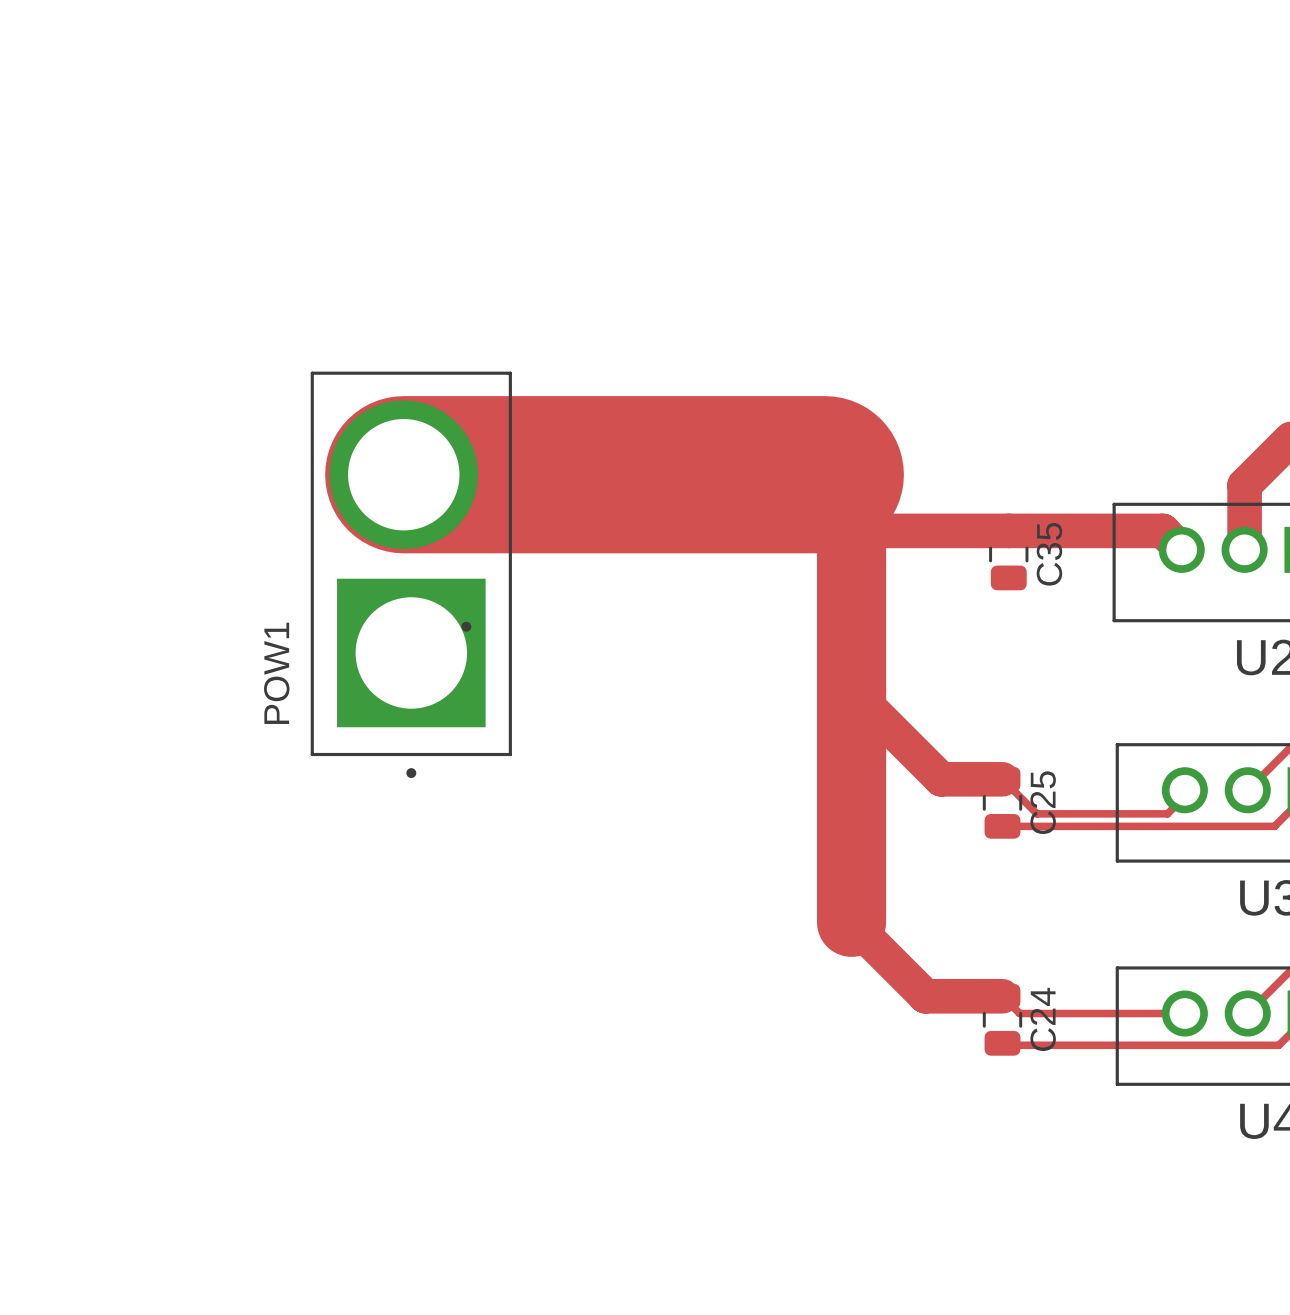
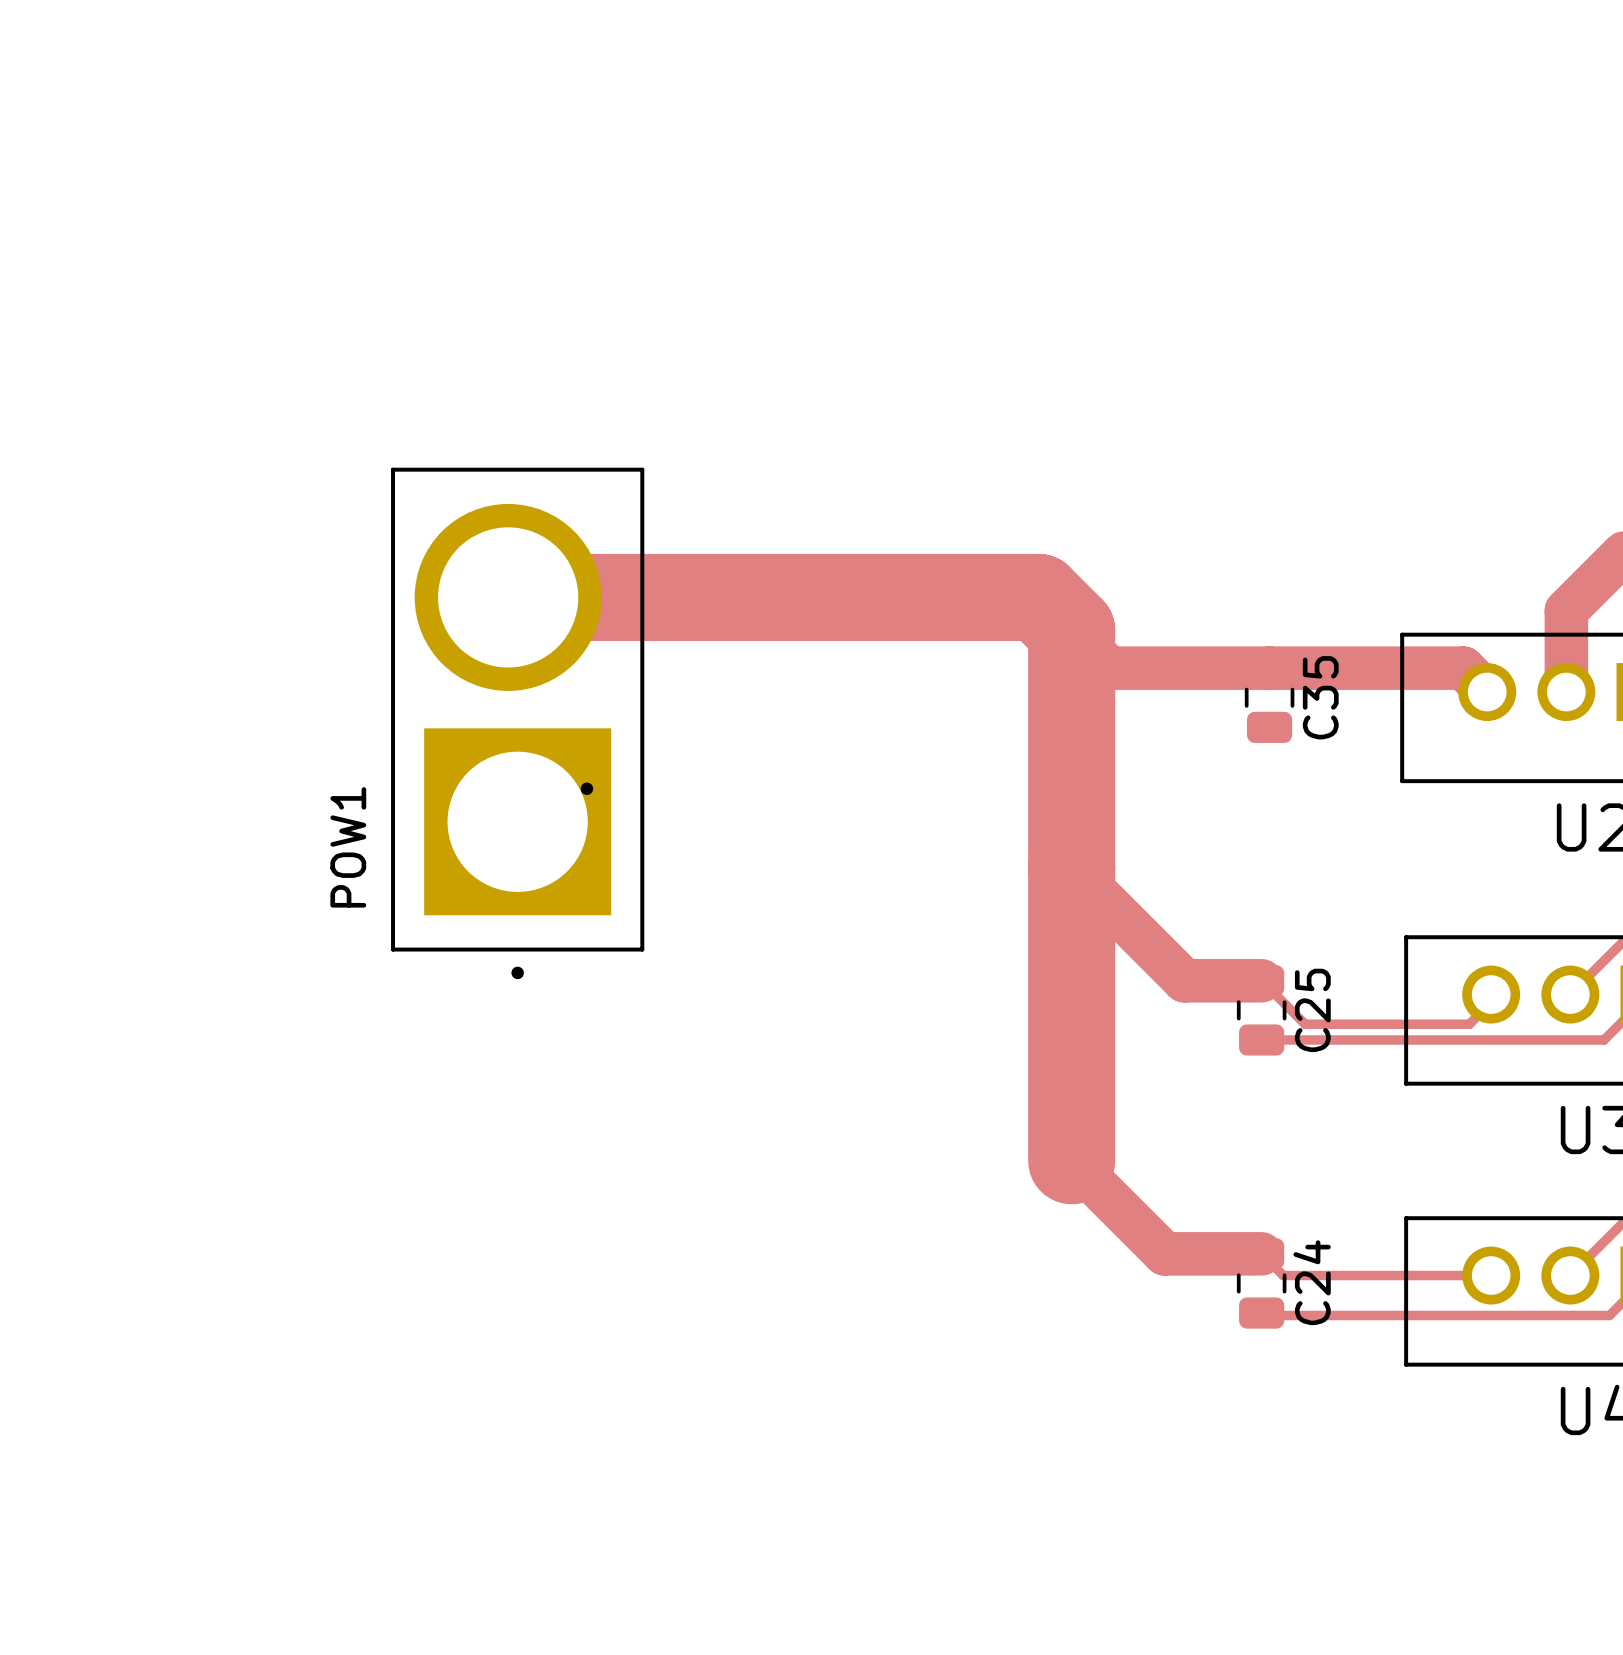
top track width: thick (403, 474) (825, 474) -> thin (508, 597) (1038, 597)

